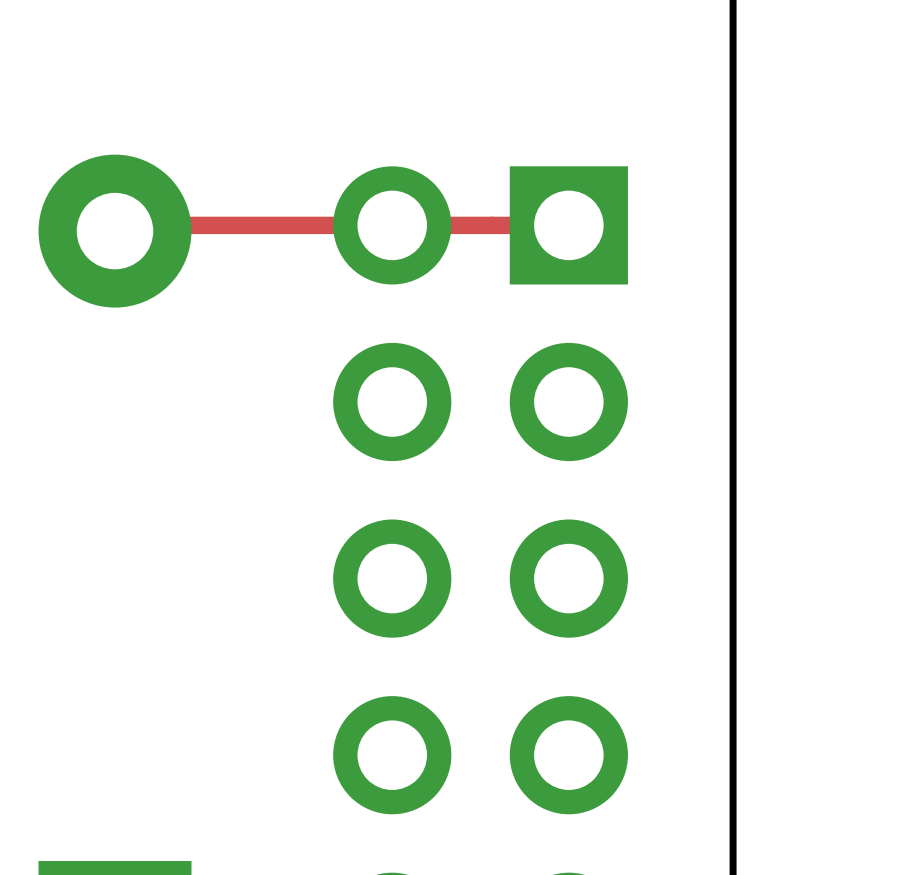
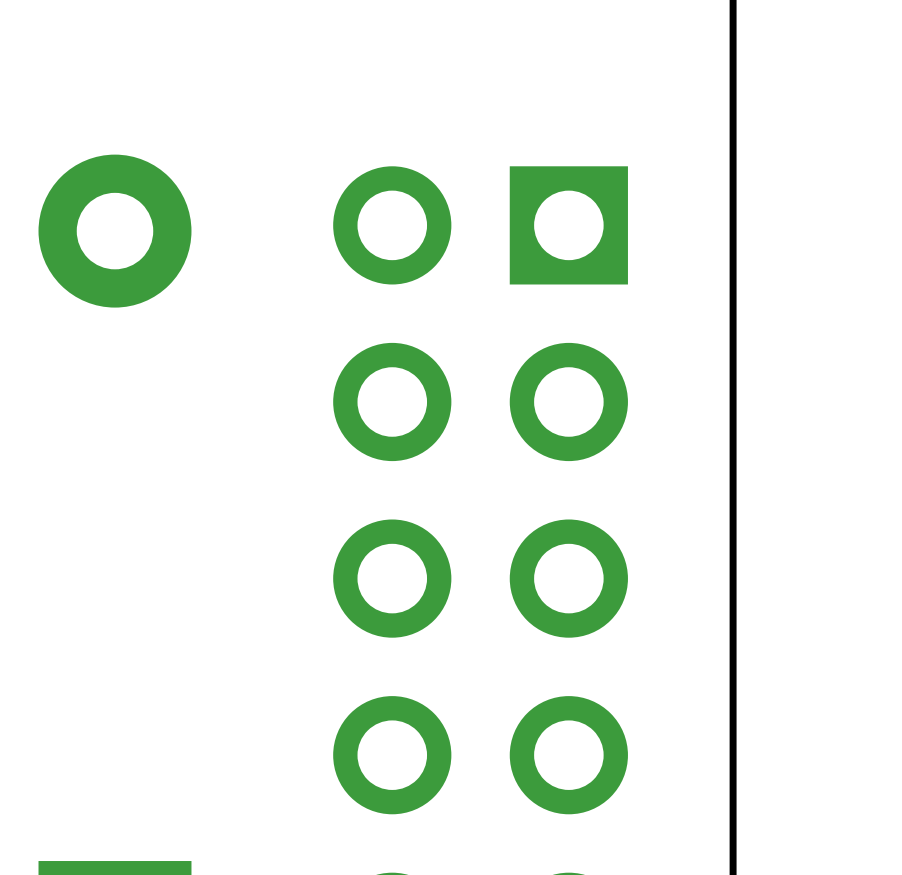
top track: (568, 225) (120, 225) (114, 231) -> none

